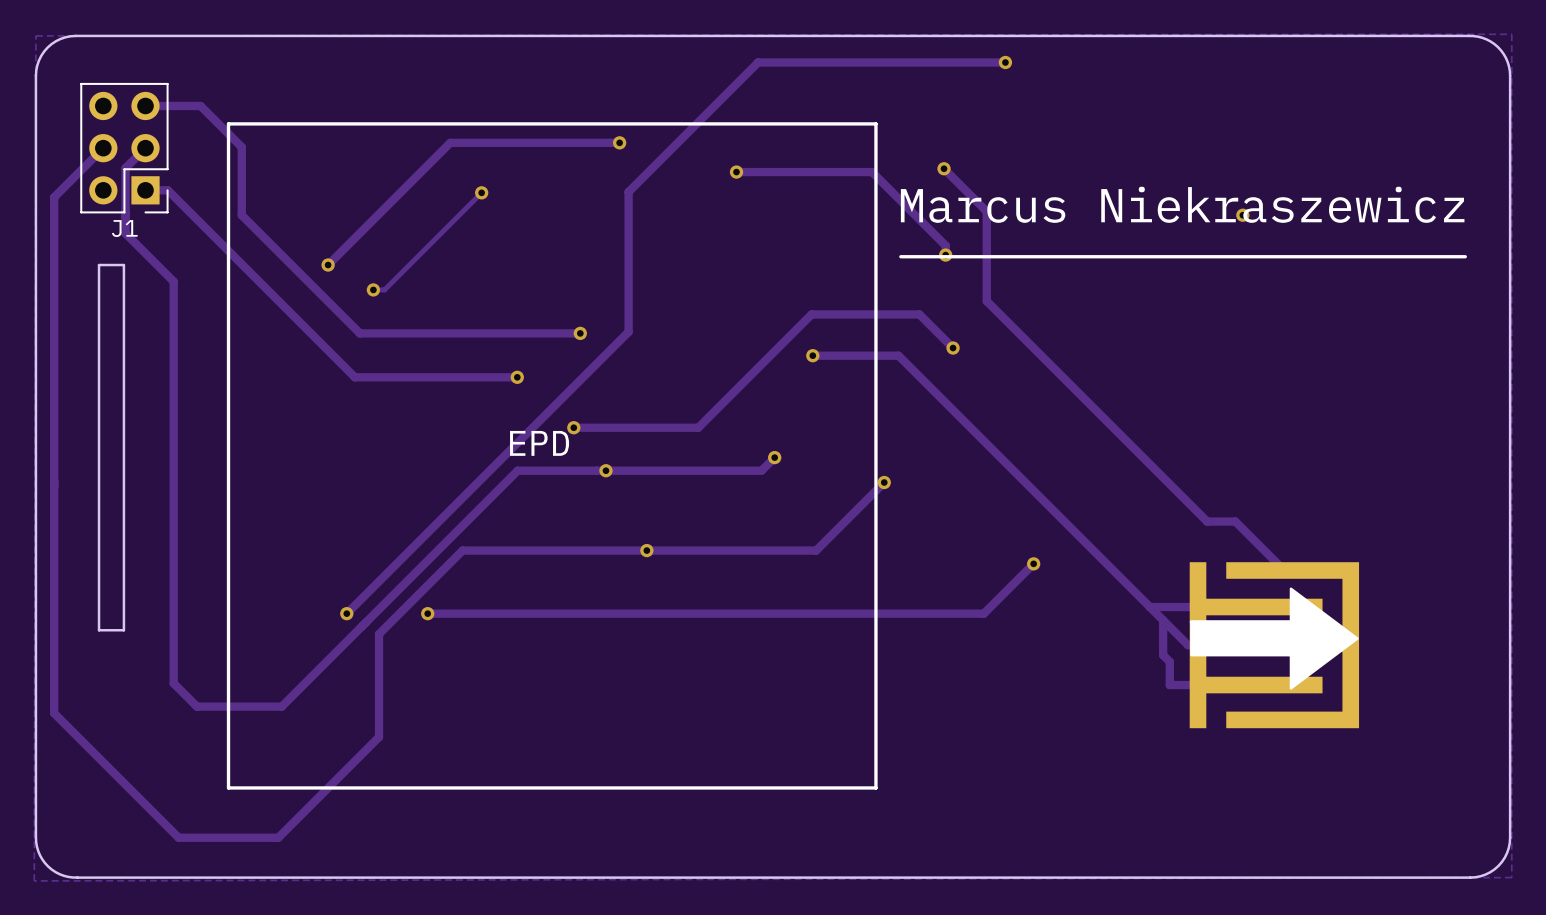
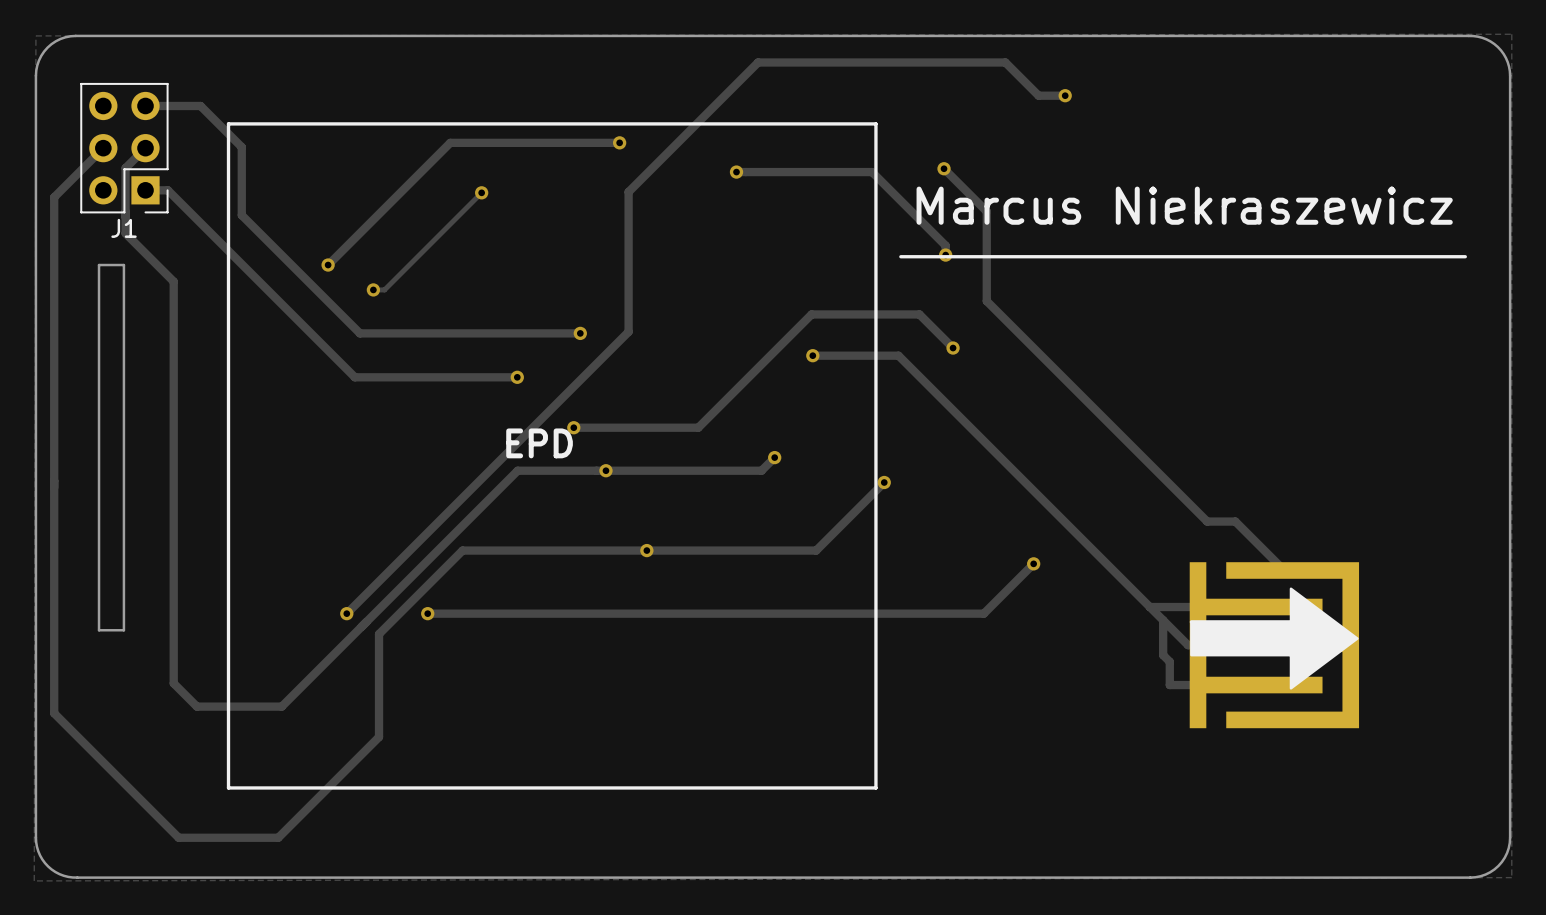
track: none -> (1005, 62) (1038, 95) (1065, 95)
via position: (1005, 62) -> (1065, 95)
via: (1242, 215) -> none

